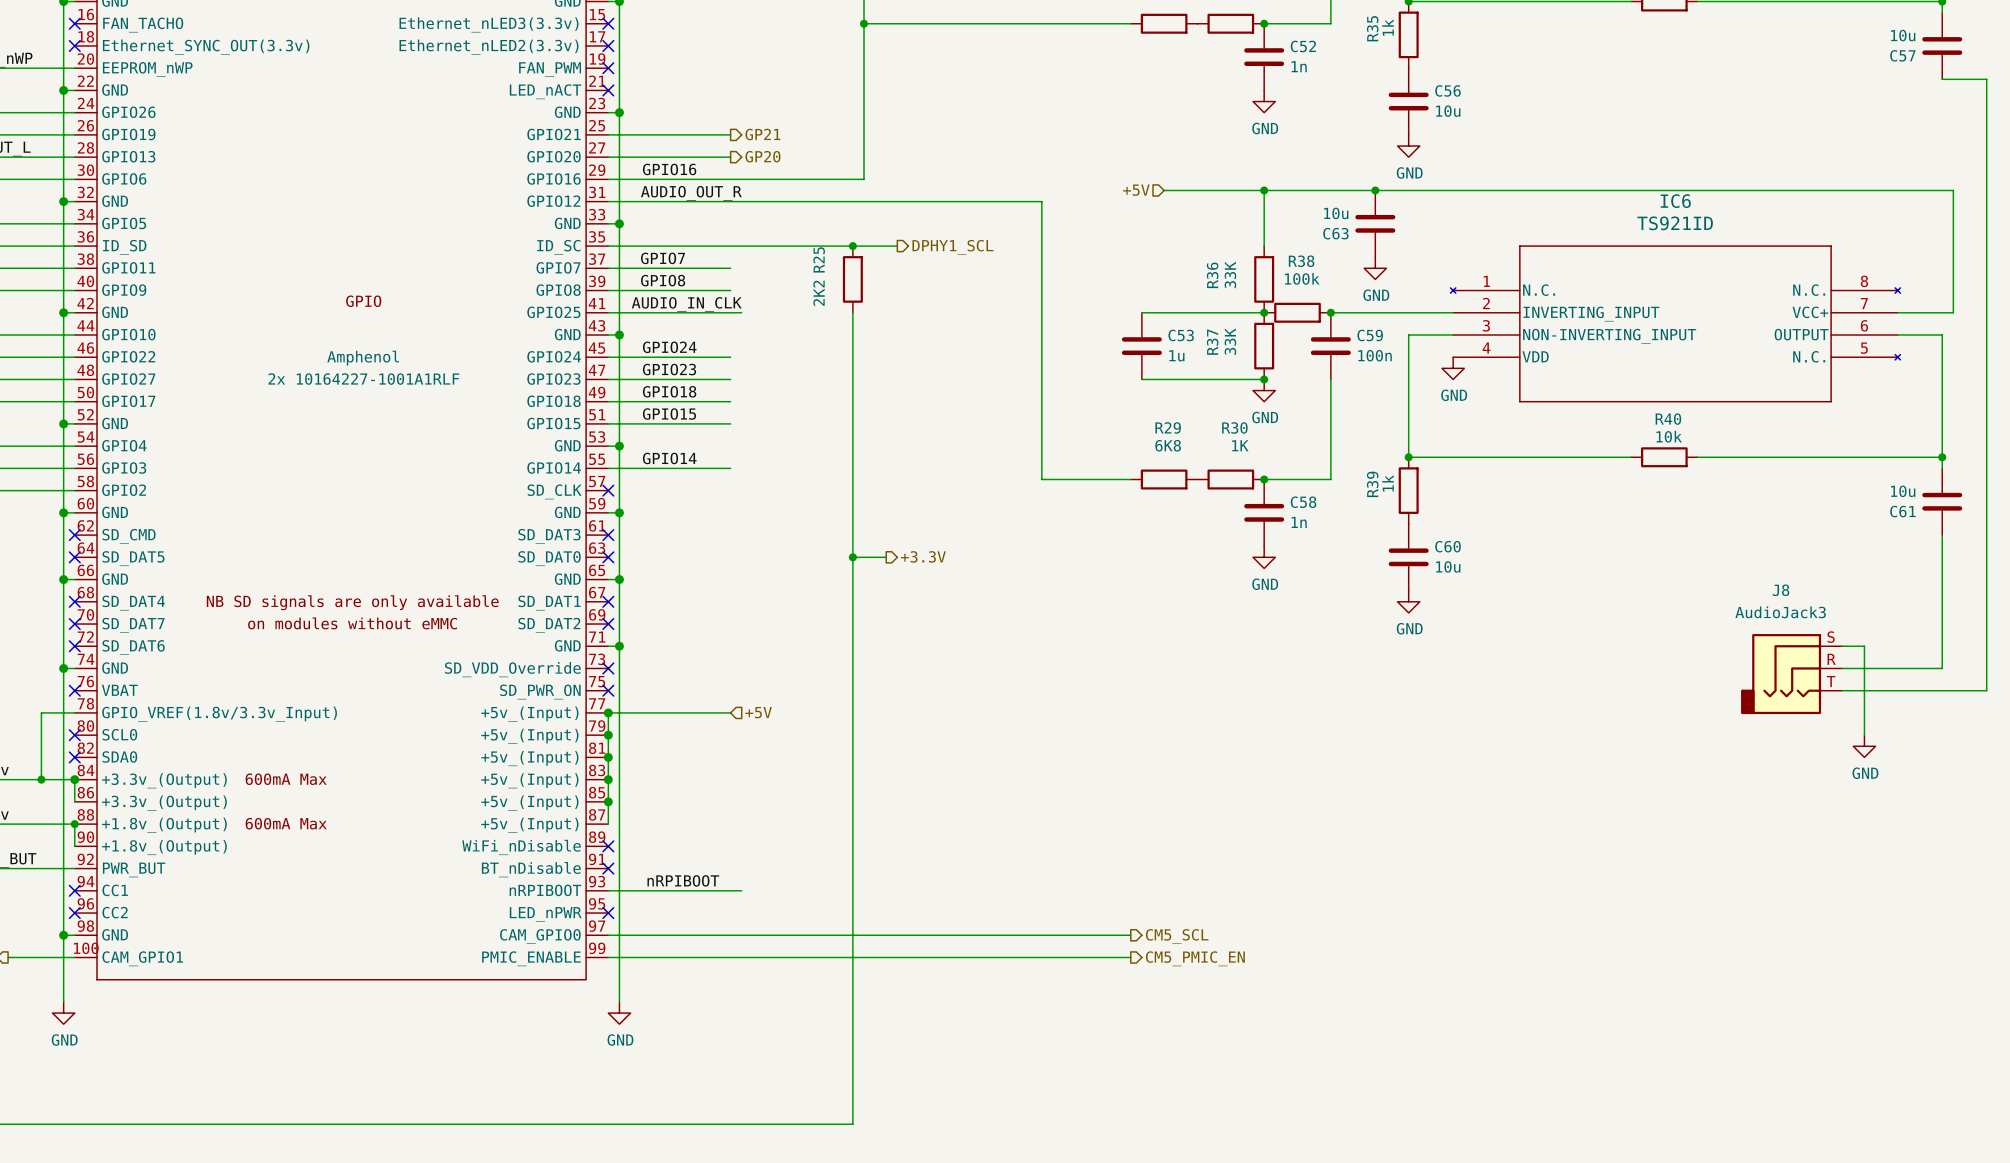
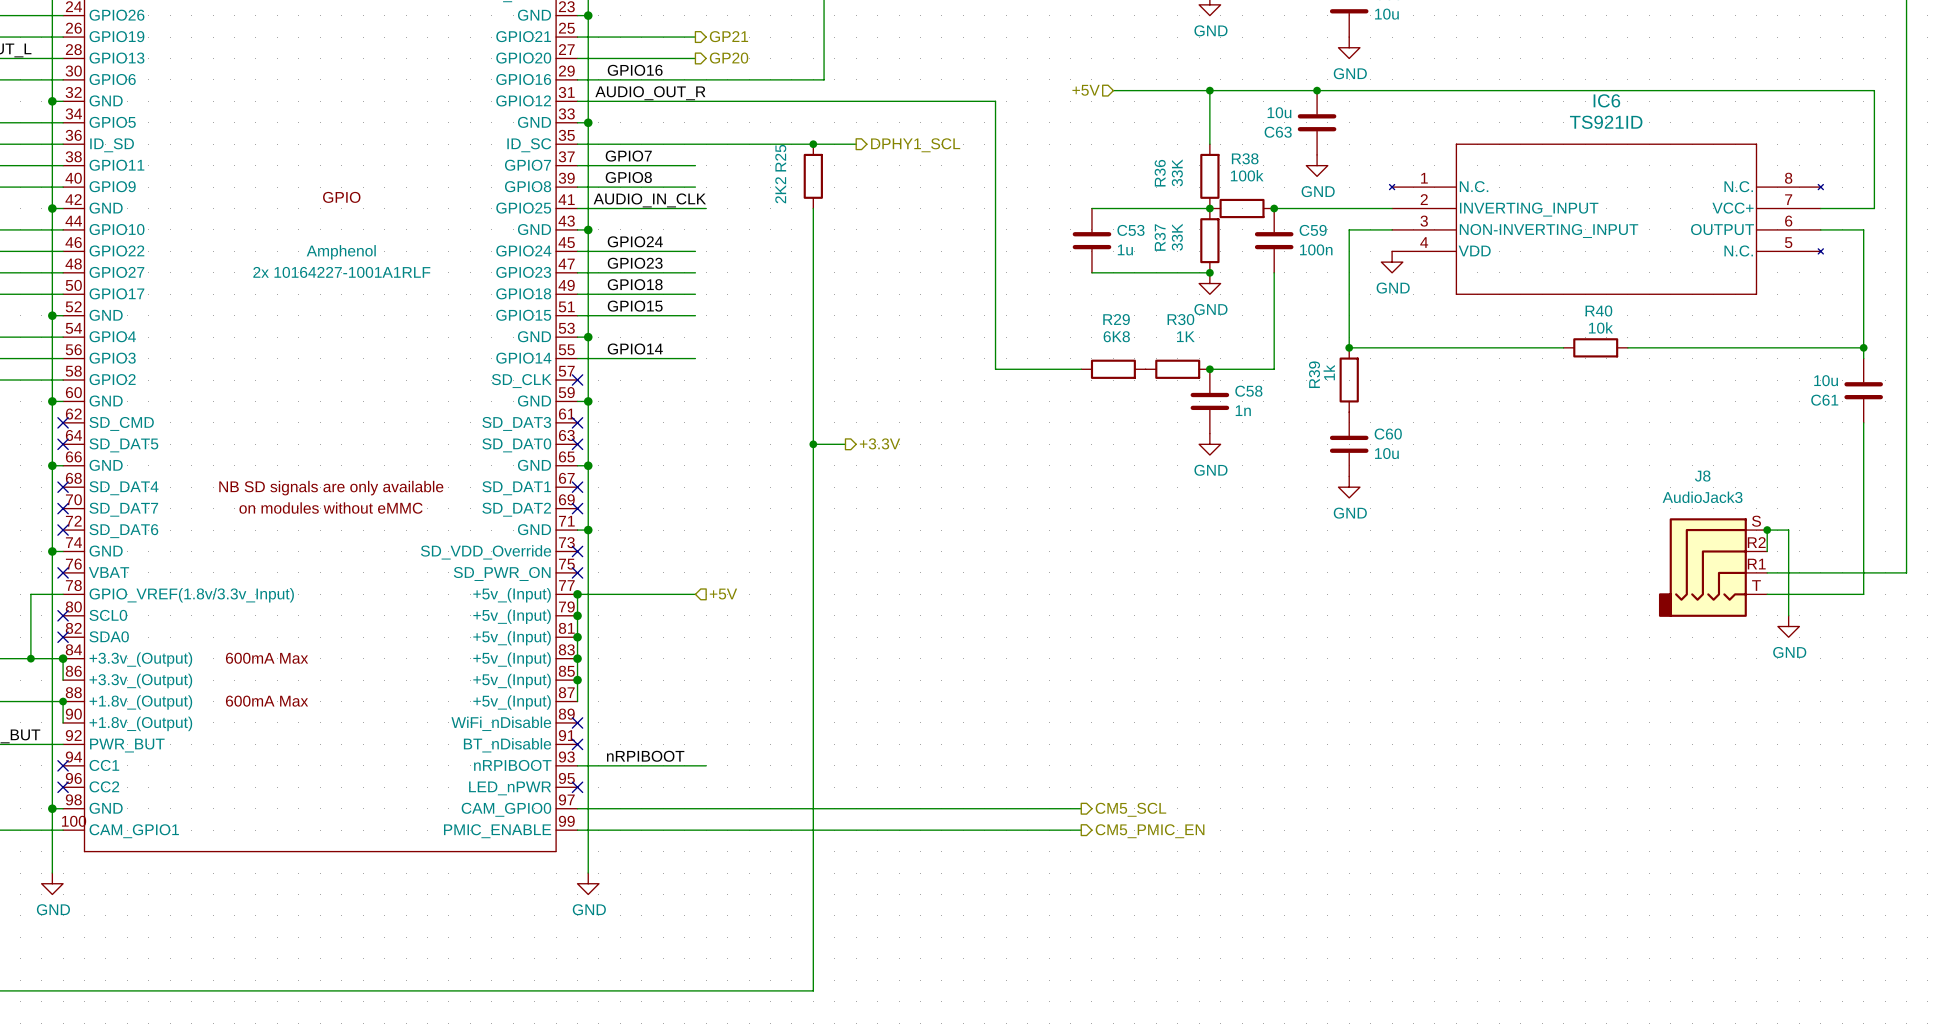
J8 symbol: [1741, 634, 1843, 715] -> [1658, 518, 1768, 617]
wire: none -> (1767, 530) (1767, 551)
junction: none -> (1767, 530)
wire: (1842, 668) (1942, 668) -> (1767, 594) (1863, 594) (1863, 551)

